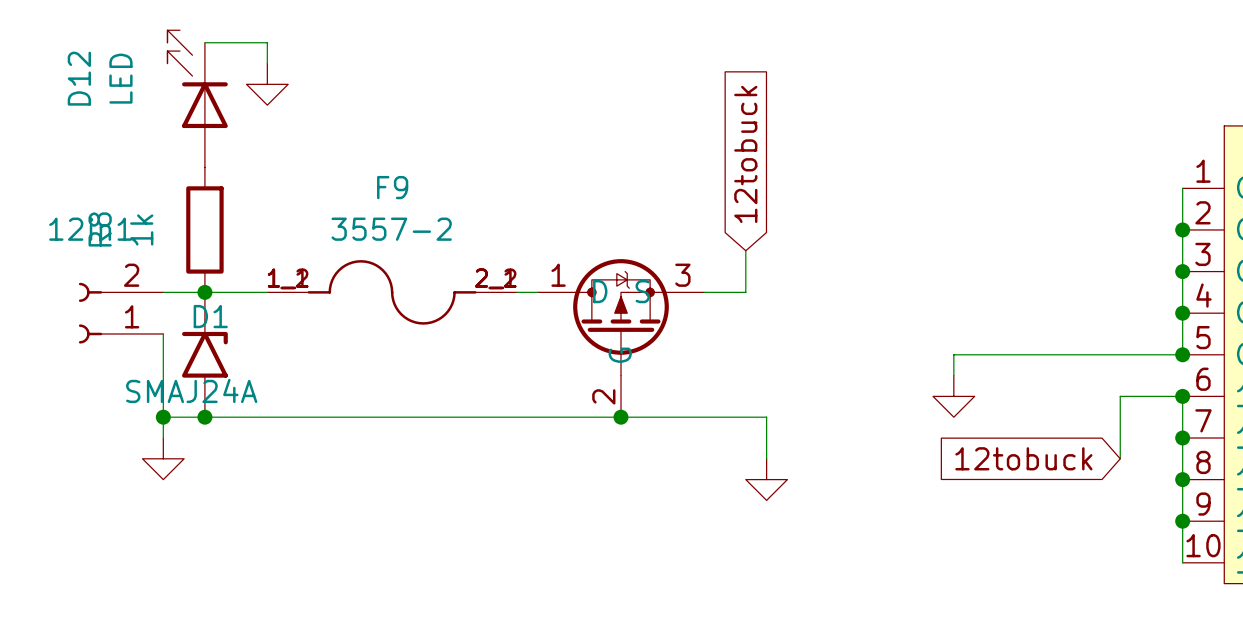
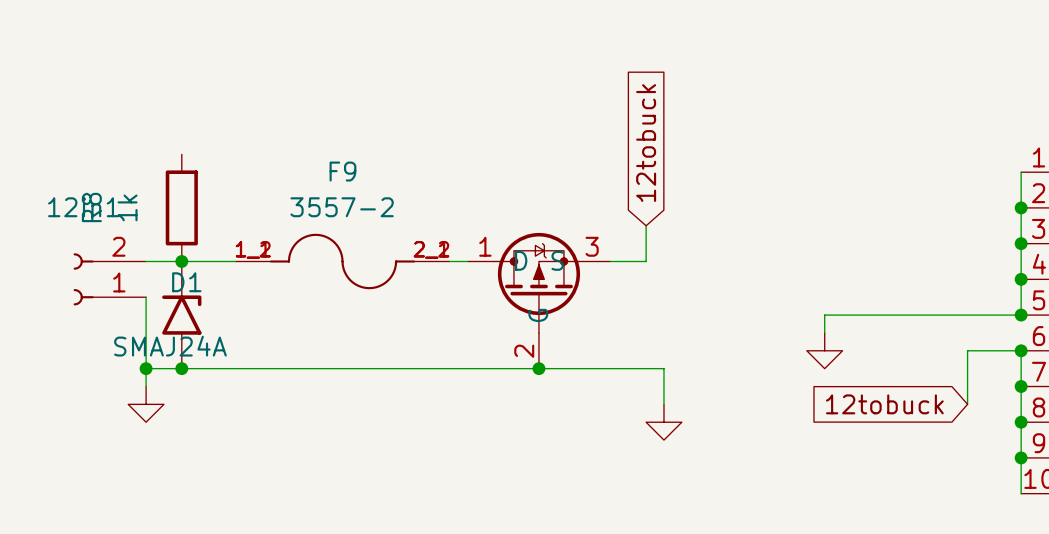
wire: (204, 42) (267, 42) (267, 63) -> none
power symbol: (267, 84) -> none
D12: LED (197, 98) -> none

